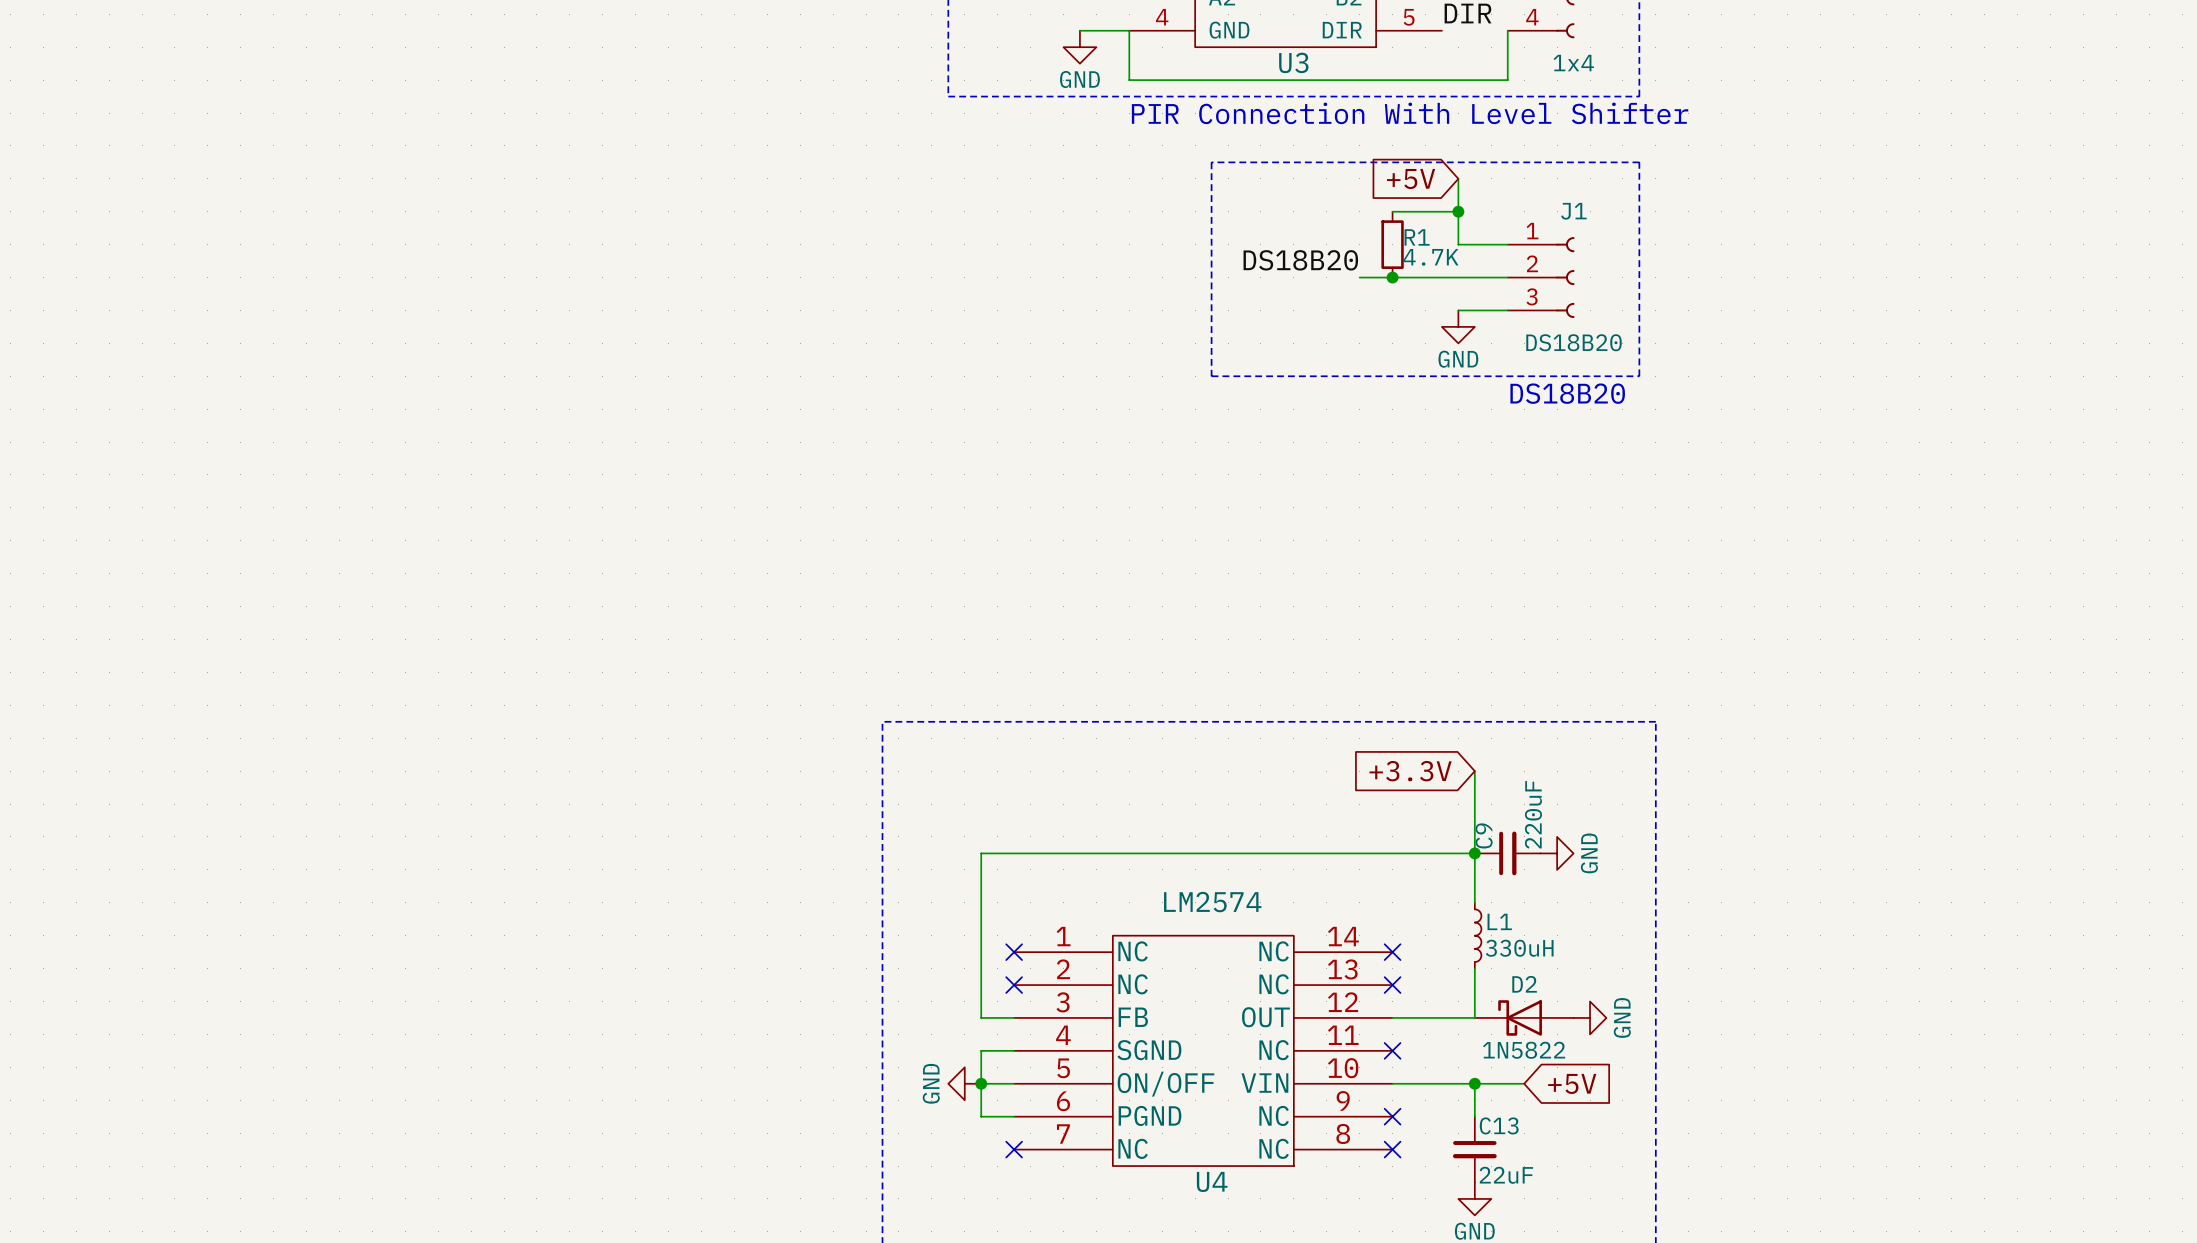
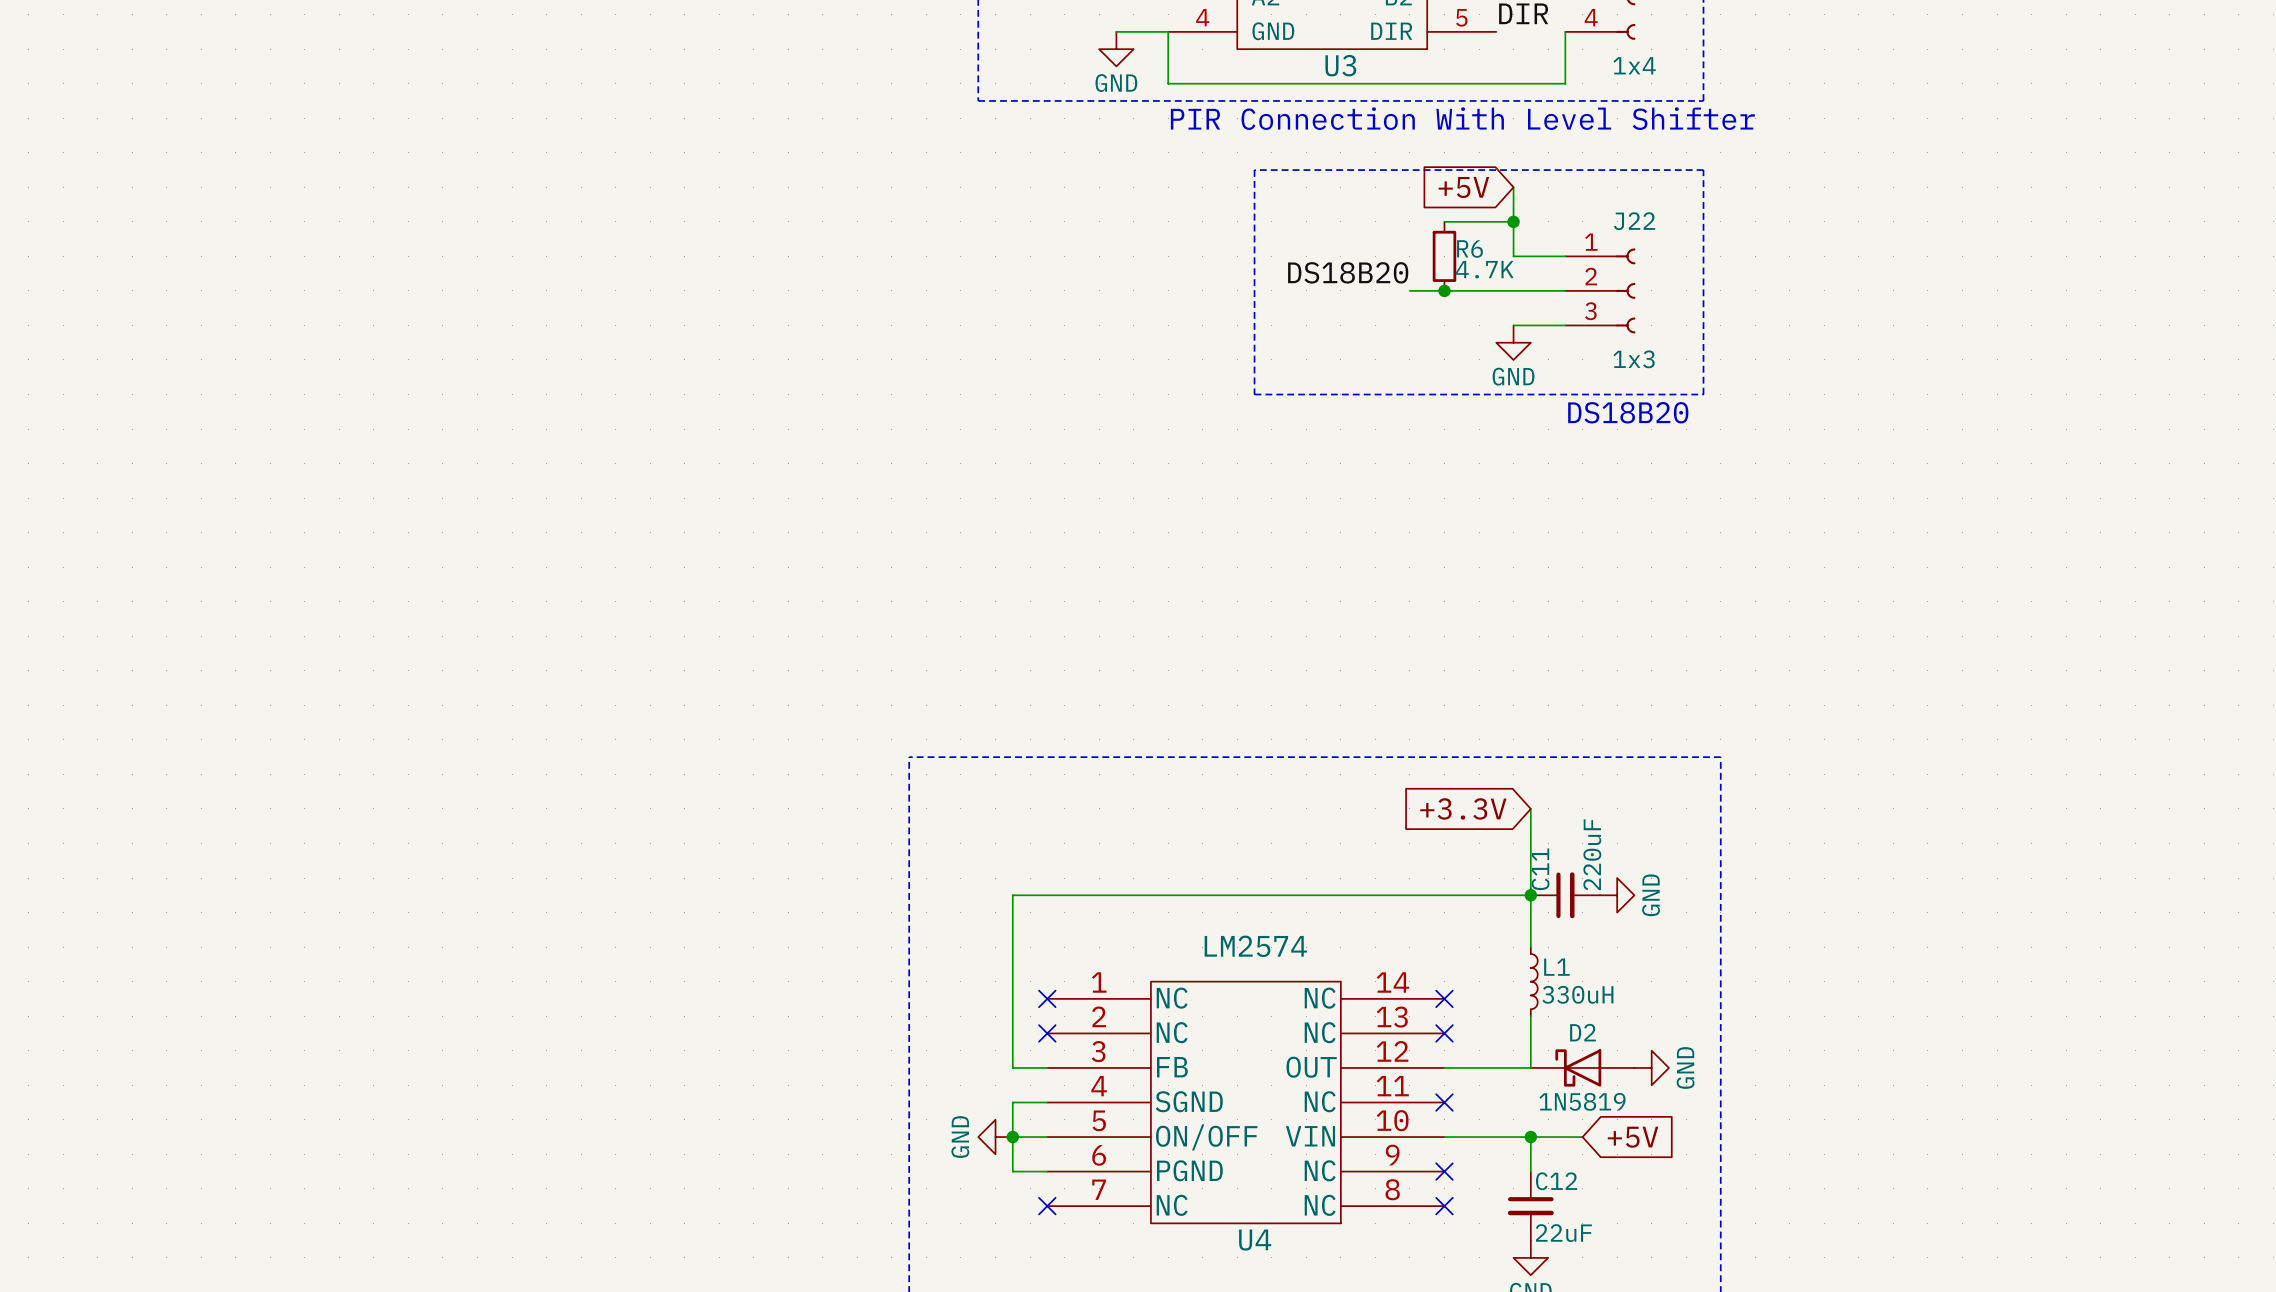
J1 name: J1 (1573, 211) -> J22 (1634, 221)
R1 name: R1 (1417, 237) -> R6 (1470, 248)
J1 value: DS18B20 (1574, 342) -> 1x3 (1634, 359)
C9 name: C9 (1484, 835) -> C11 (1540, 869)
D2 value: 1N5822 (1524, 1050) -> 1N5819 (1582, 1101)
C13 name: C13 (1499, 1125) -> C12 (1556, 1181)

